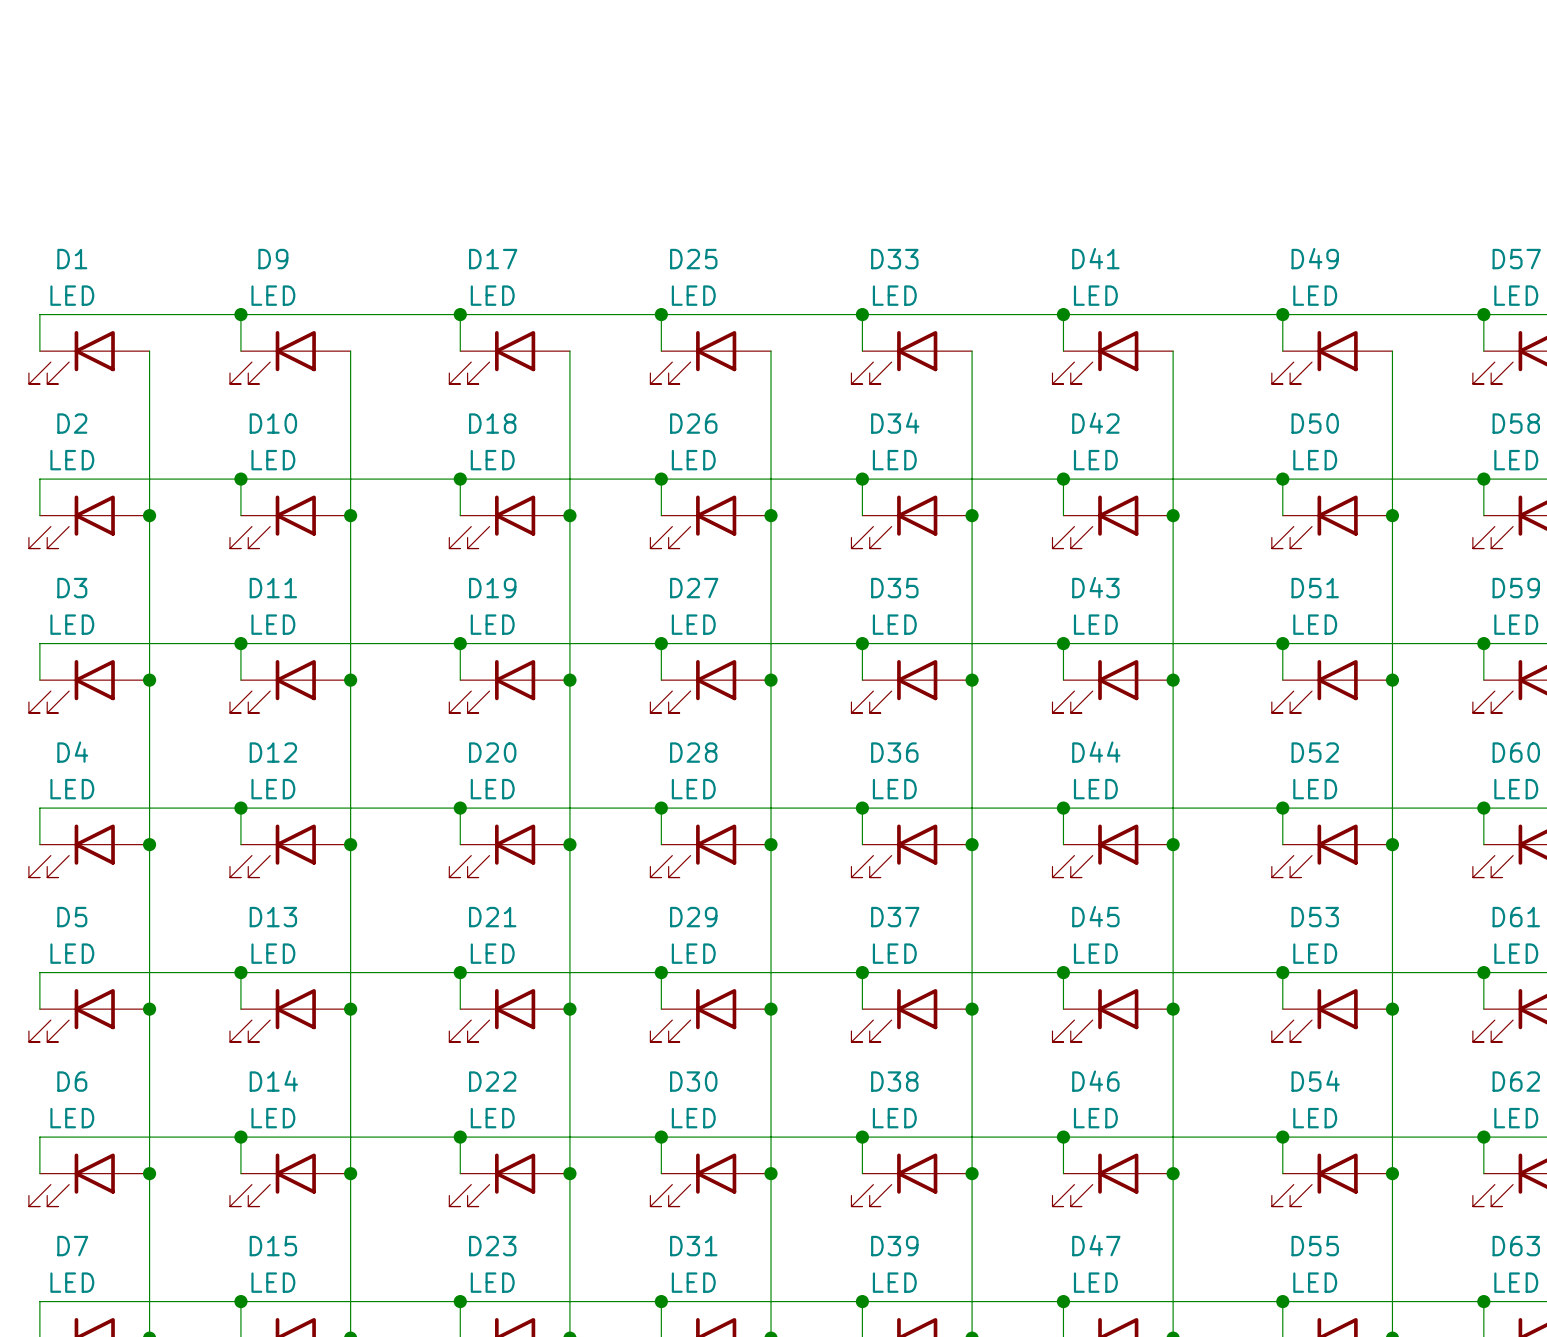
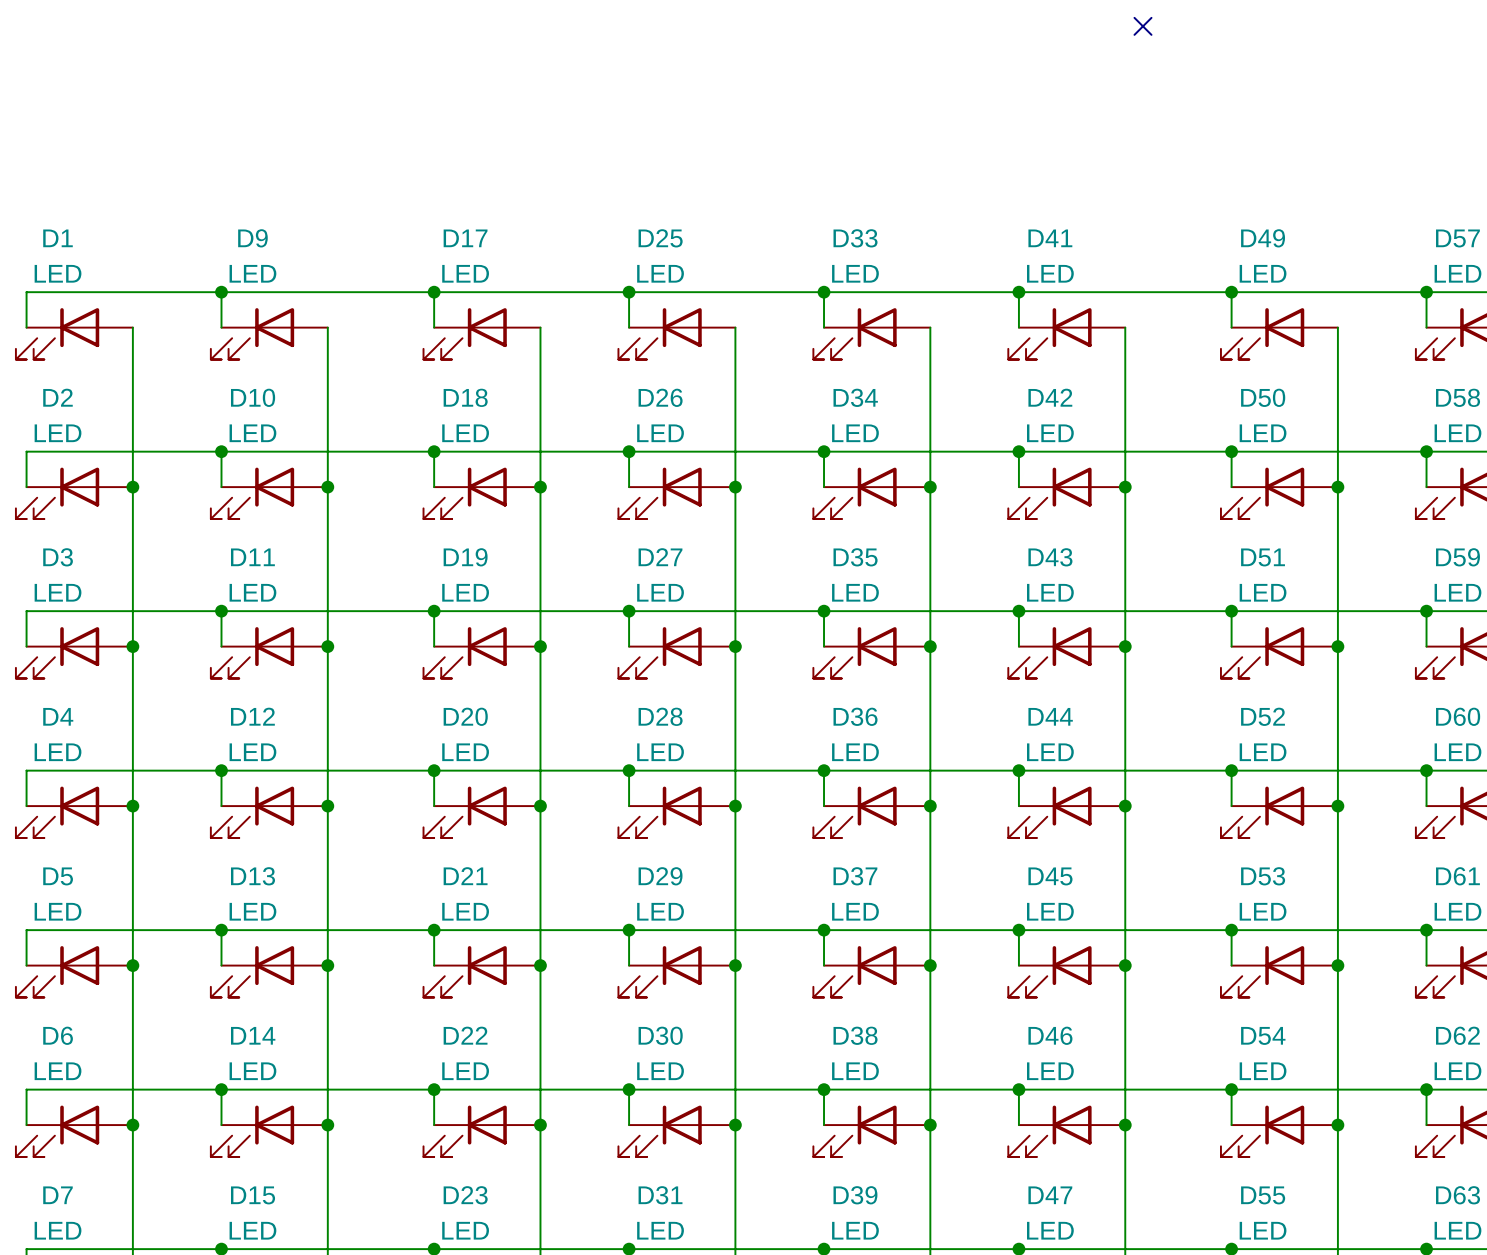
no-connect mark: none -> (1142, 26)

